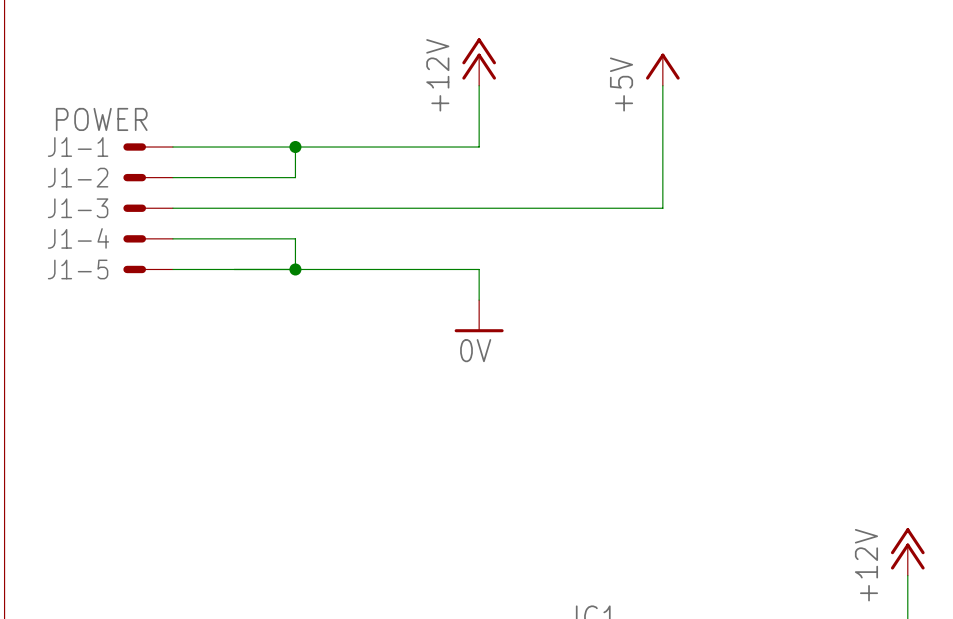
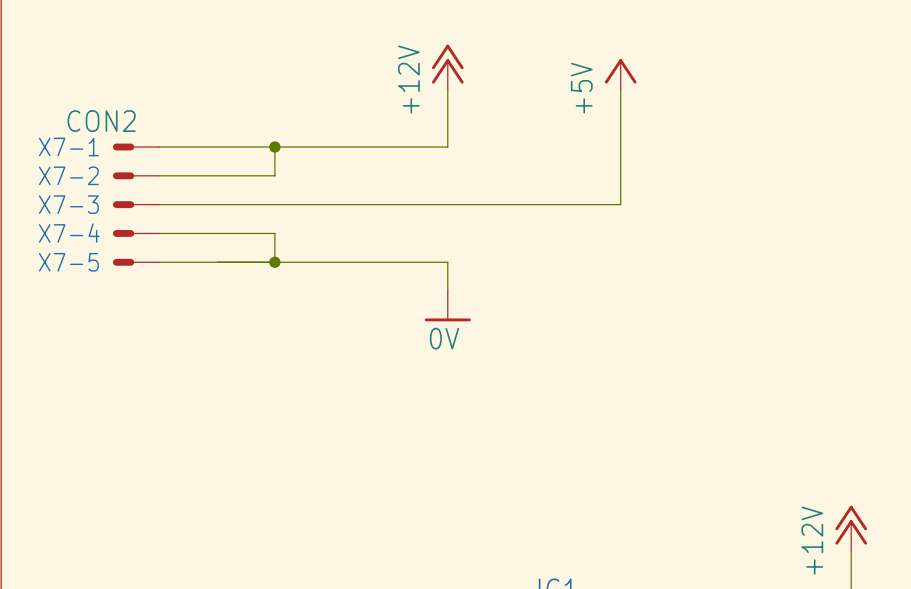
J1-1 value: POWER (101, 119) -> CON2 (101, 121)
J1-1 name: J1-1 (78, 147) -> X7-1 (68, 147)
J1-2 name: J1-2 (78, 177) -> X7-2 (68, 175)
J1-3 name: J1-3 (78, 208) -> X7-3 (68, 204)
J1-4 name: J1-4 (78, 238) -> X7-4 (69, 233)
J1-5 name: J1-5 (78, 269) -> X7-5 (68, 262)

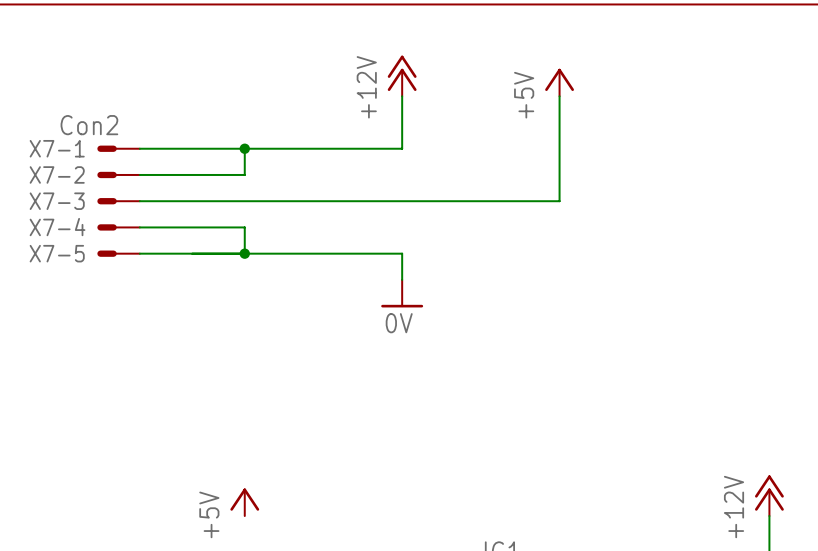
X7-1 value: CON2 (101, 121) -> Con2 (89, 125)
power symbol: none -> +5V (244, 502)

